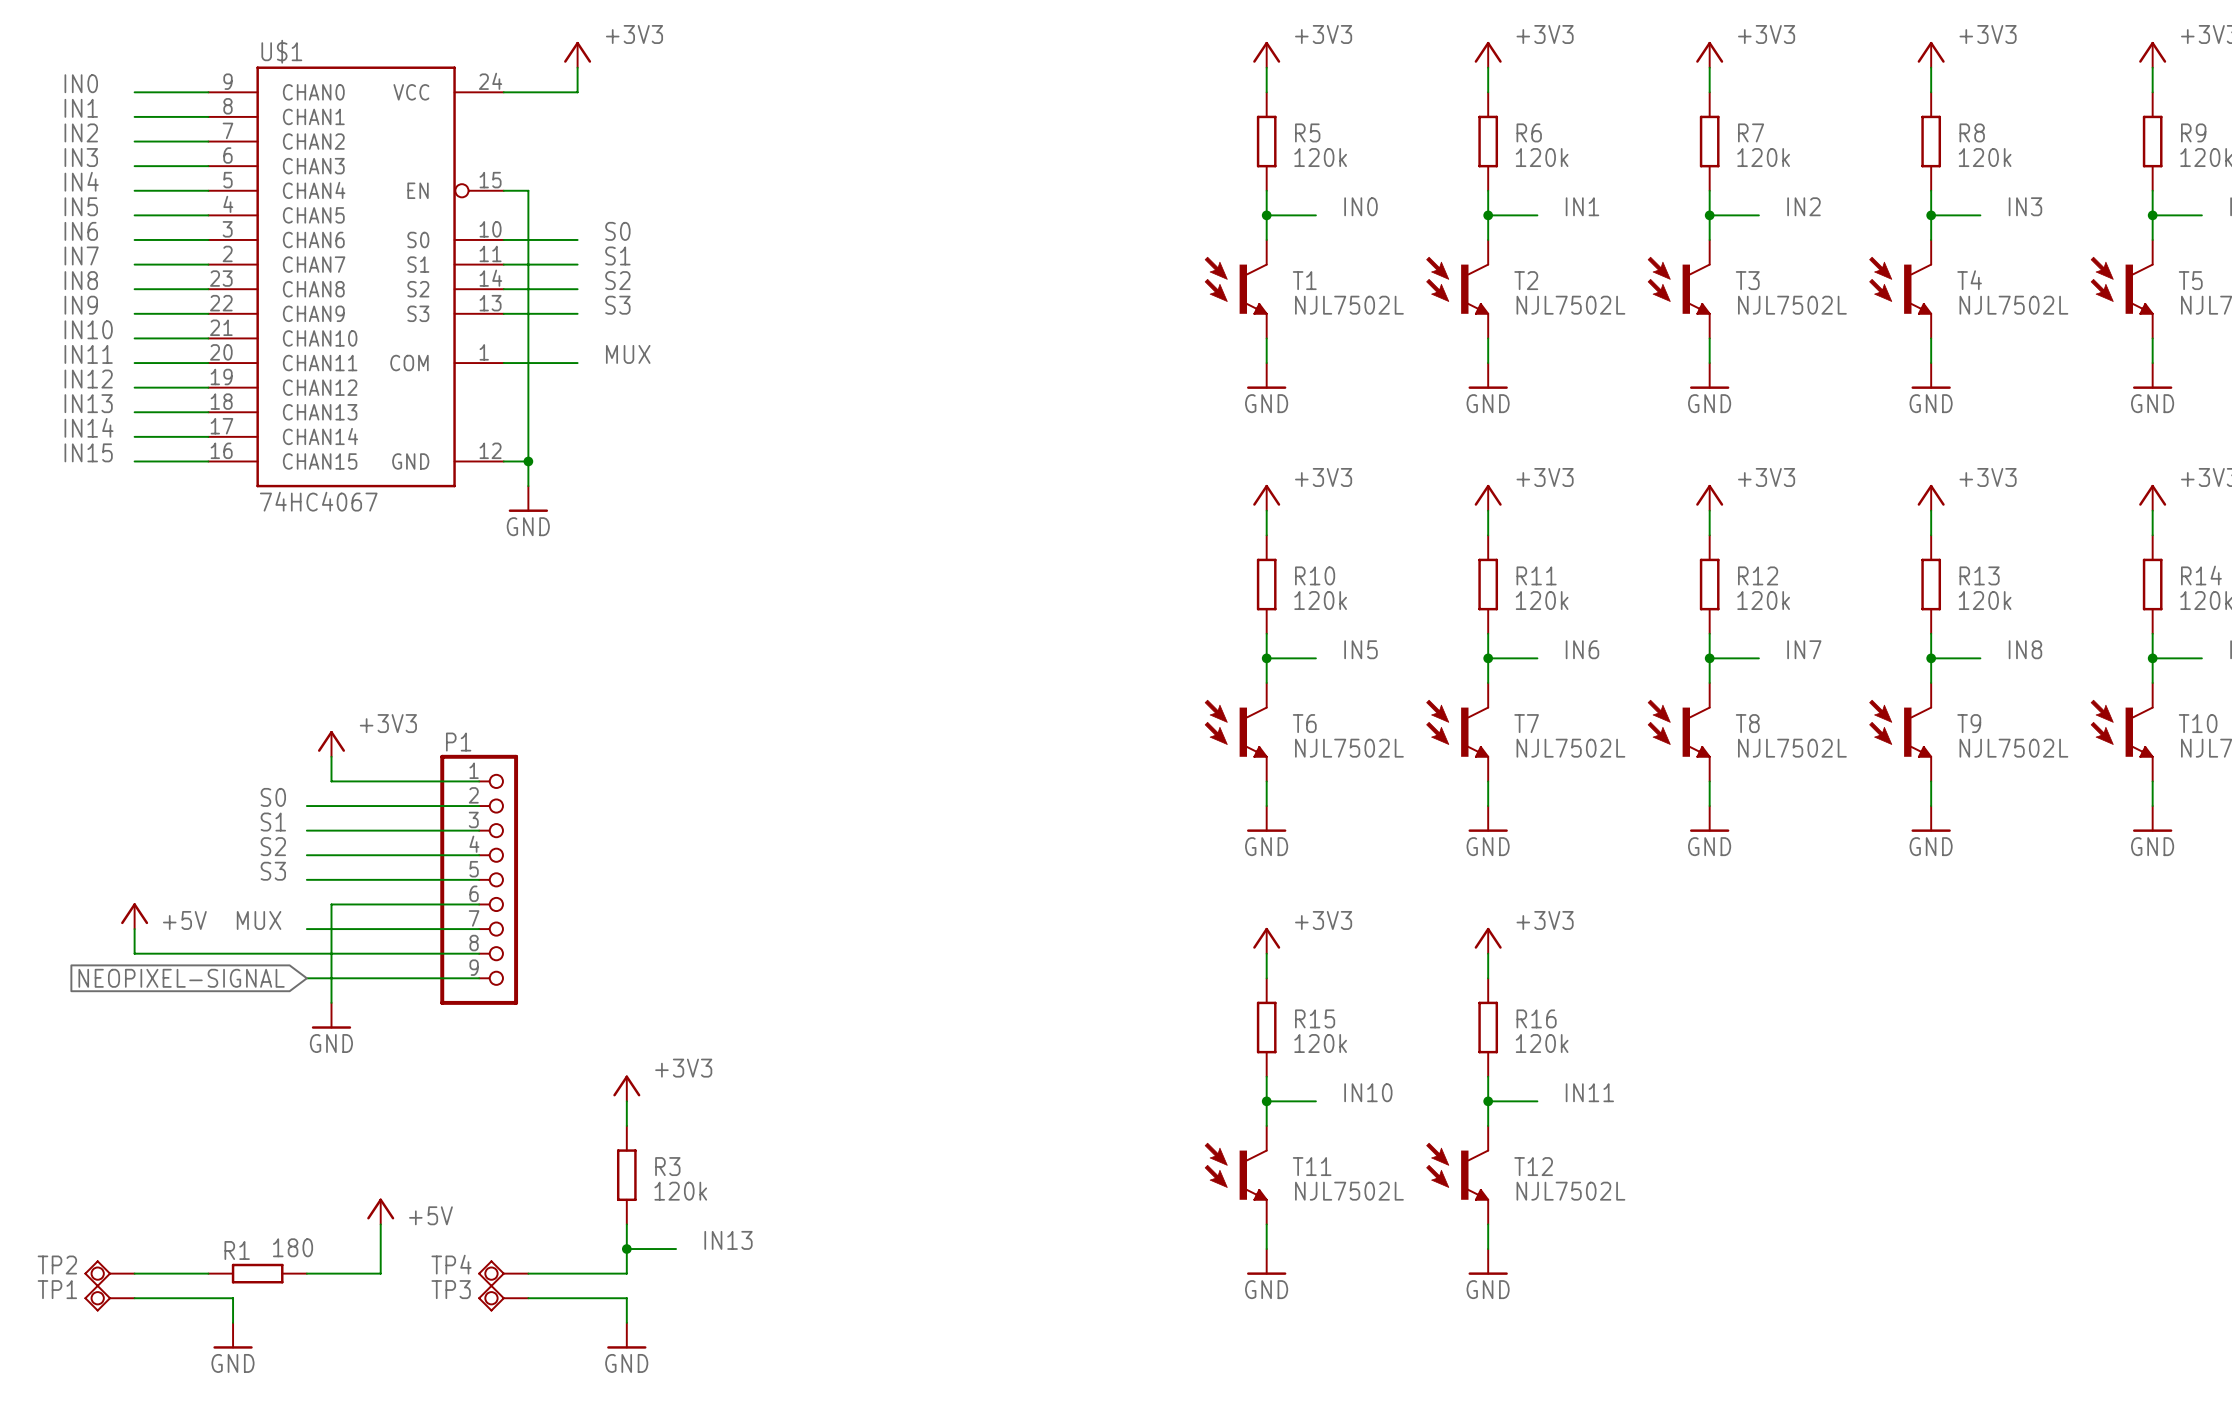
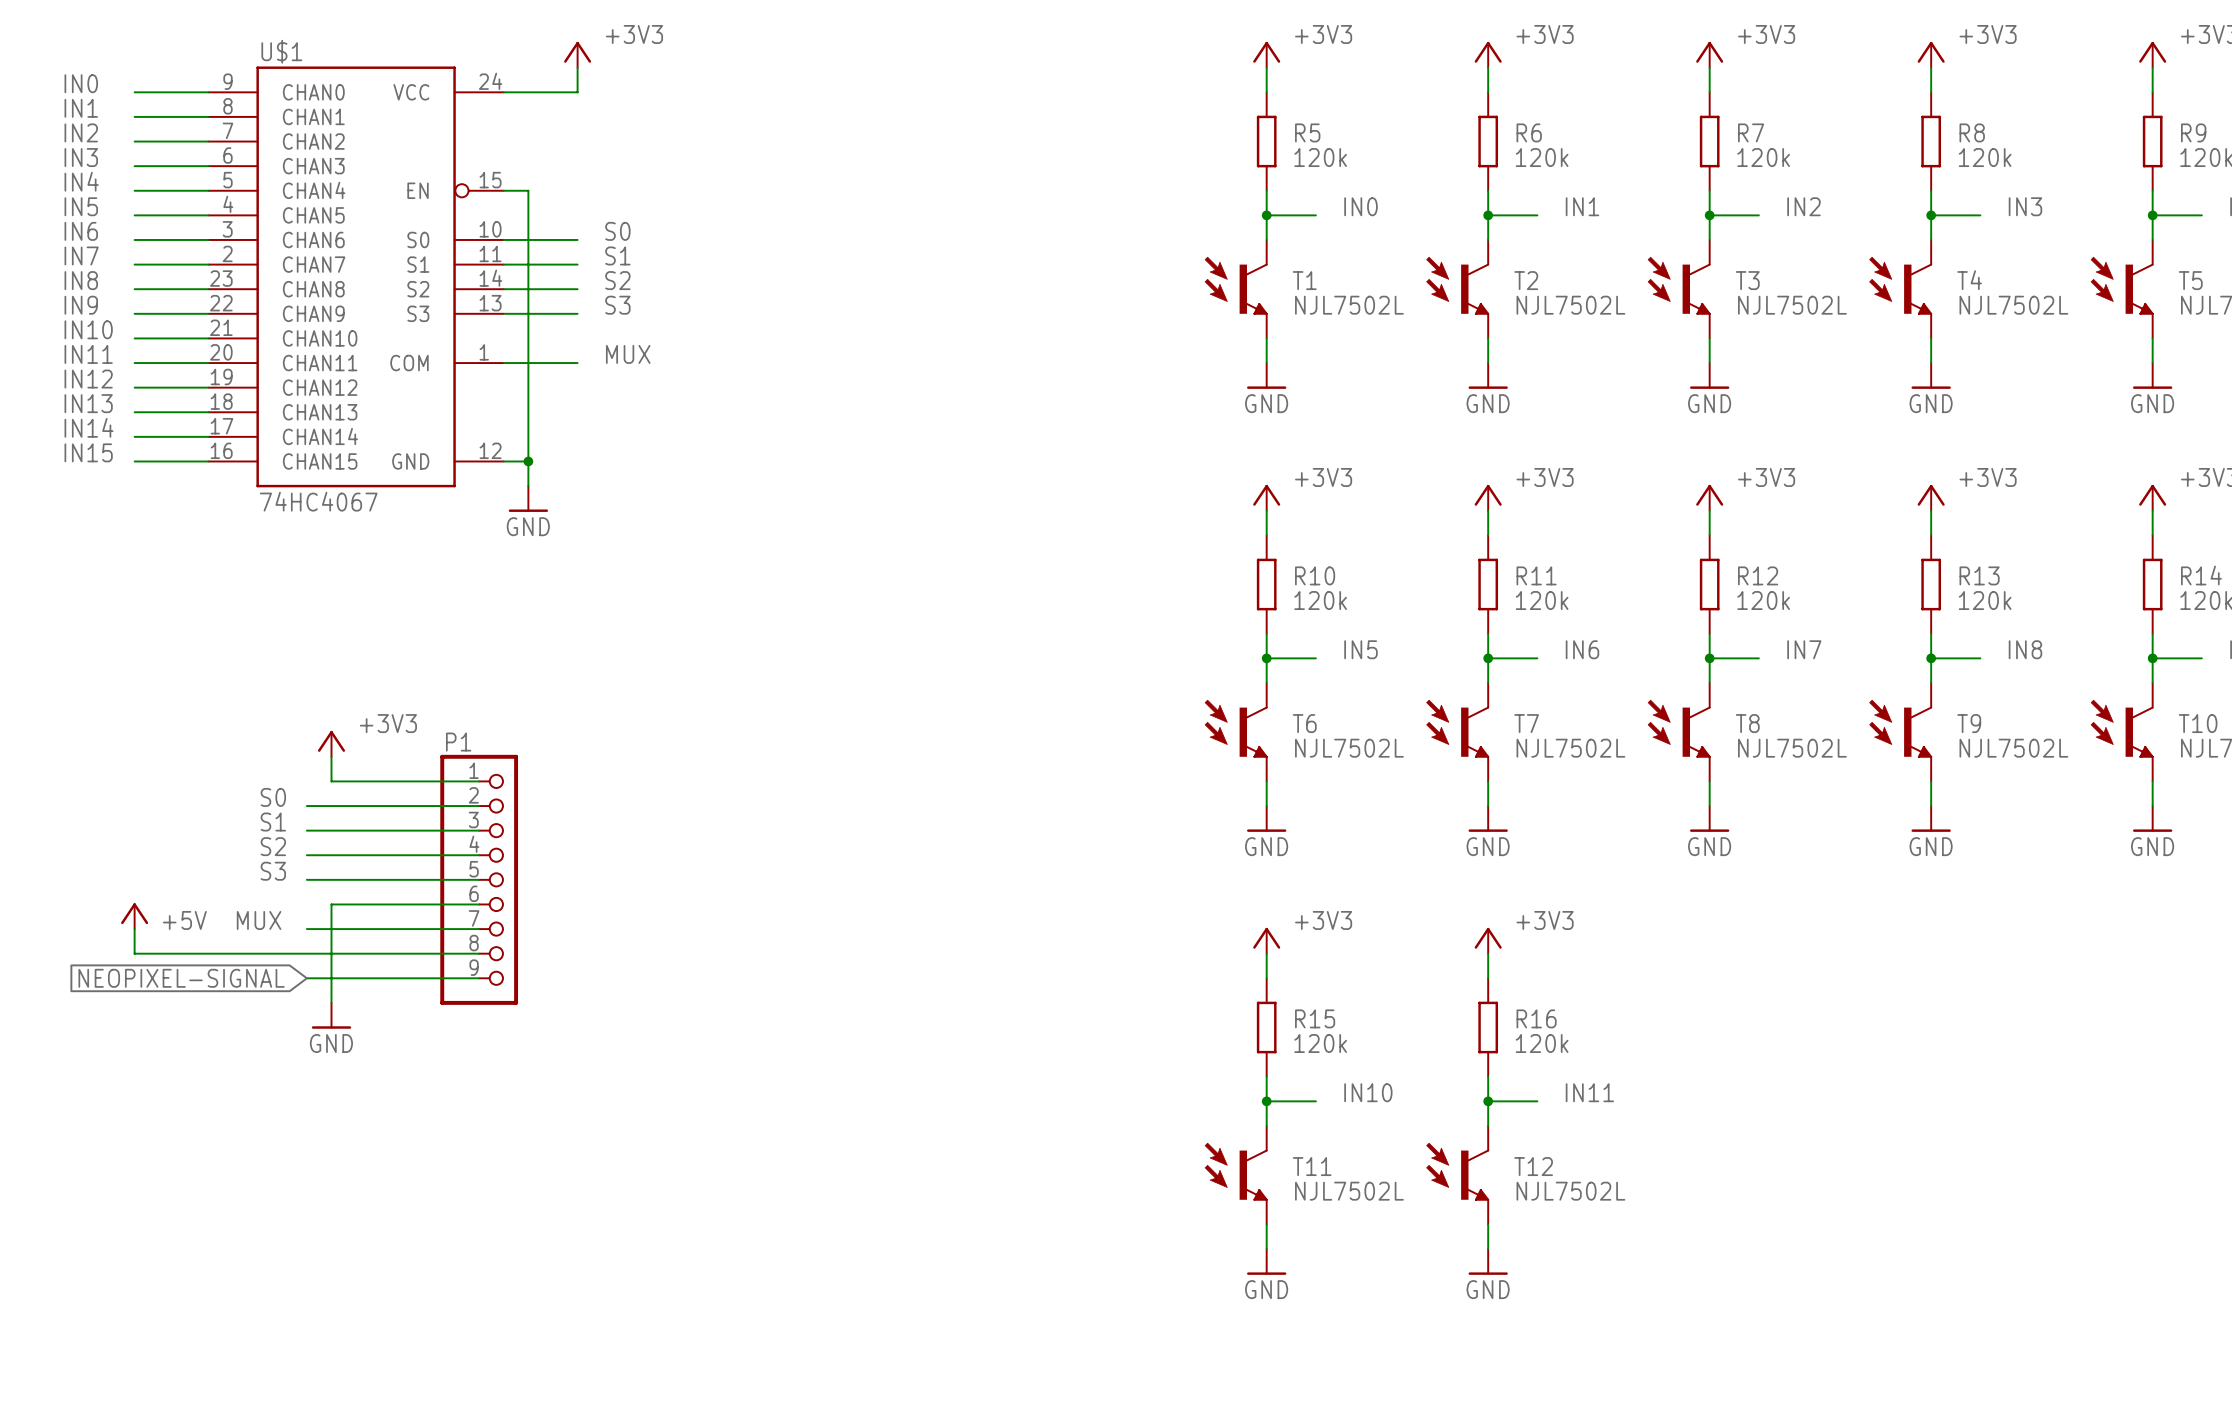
power symbol: +3V3 (626, 1088) -> none
wire: (626, 1101) (626, 1125) -> none
R3: 120k (626, 1175) -> none
power symbol: +5V (380, 1211) -> none
wire: (380, 1224) (380, 1273) (306, 1273) -> none
wire: (626, 1224) (626, 1273) (528, 1273) -> none
label: IN13 (728, 1240) -> none
wire: (626, 1249) (676, 1249) -> none
junction: (626, 1249) -> none
TP2: (109, 1273) -> none
wire: (134, 1273) (208, 1273) -> none
R1: 180 (257, 1273) -> none
TP4: (503, 1273) -> none
TP1: (109, 1298) -> none
wire: (134, 1298) (233, 1298) (233, 1322) -> none
TP3: (503, 1298) -> none
wire: (528, 1298) (626, 1298) (626, 1322) -> none
power symbol: GND (233, 1335) -> none
power symbol: GND (626, 1335) -> none

